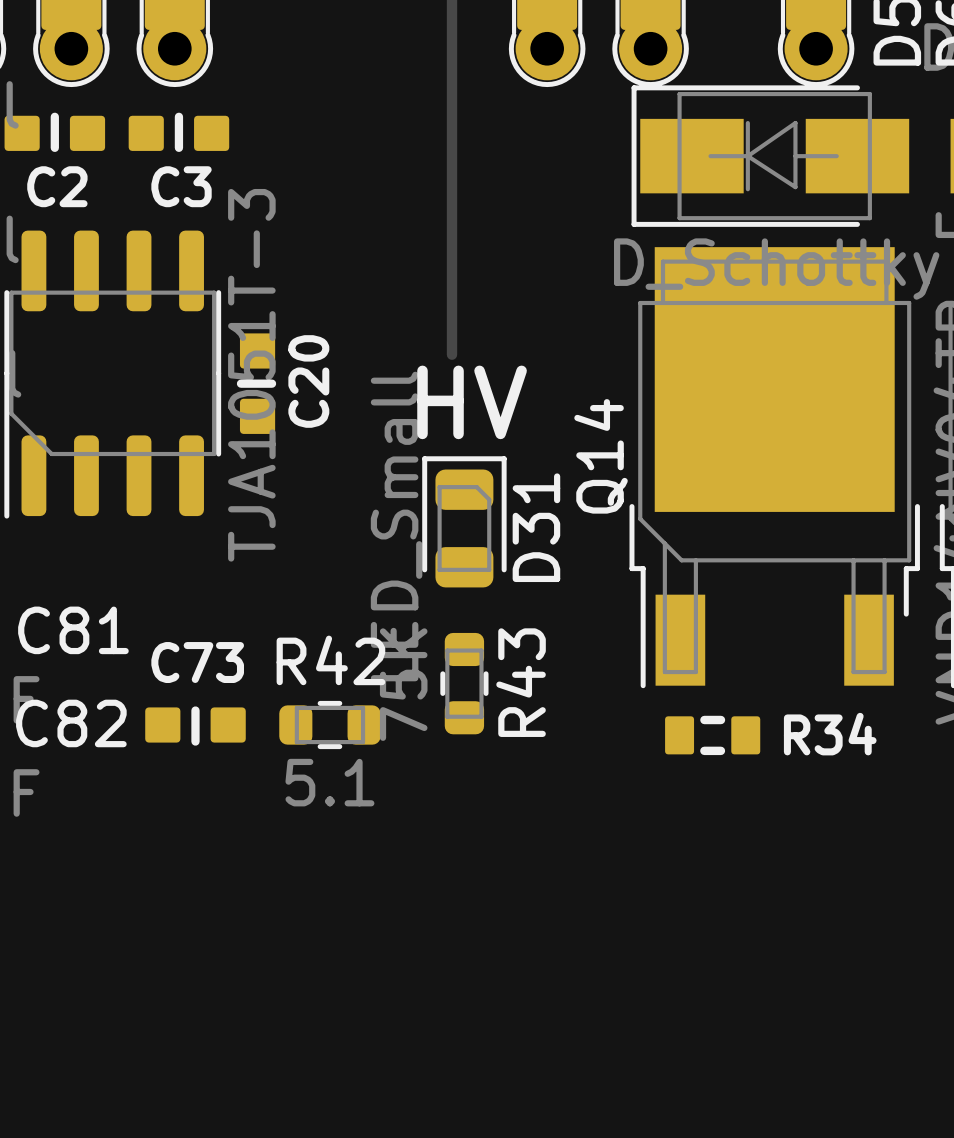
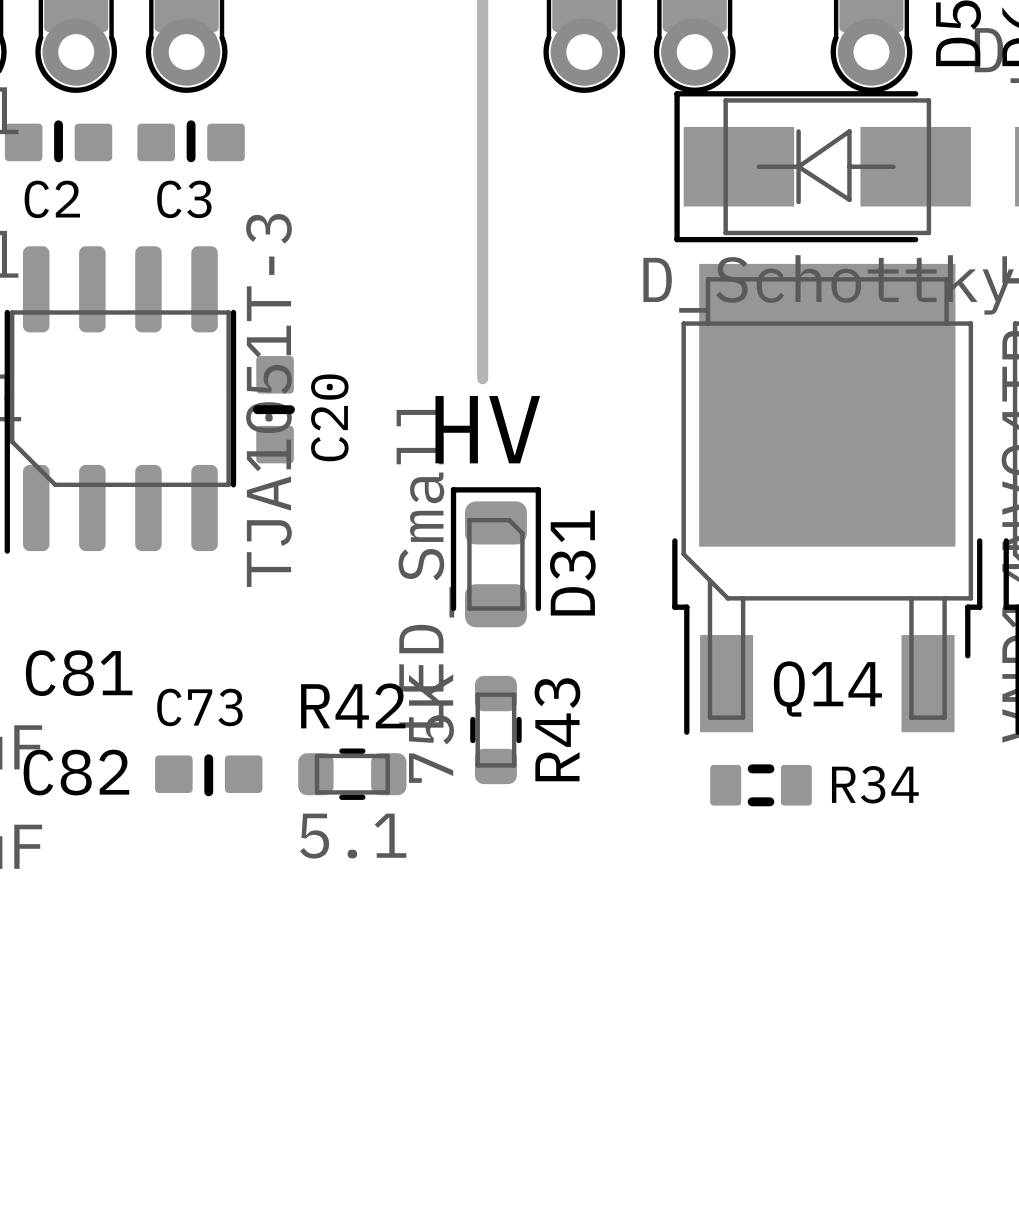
Q14 name rotation: 0° (601, 456) -> 90° clockwise (827, 688)
Q14 name position: Q14 (601, 456) -> Q14 (827, 688)

